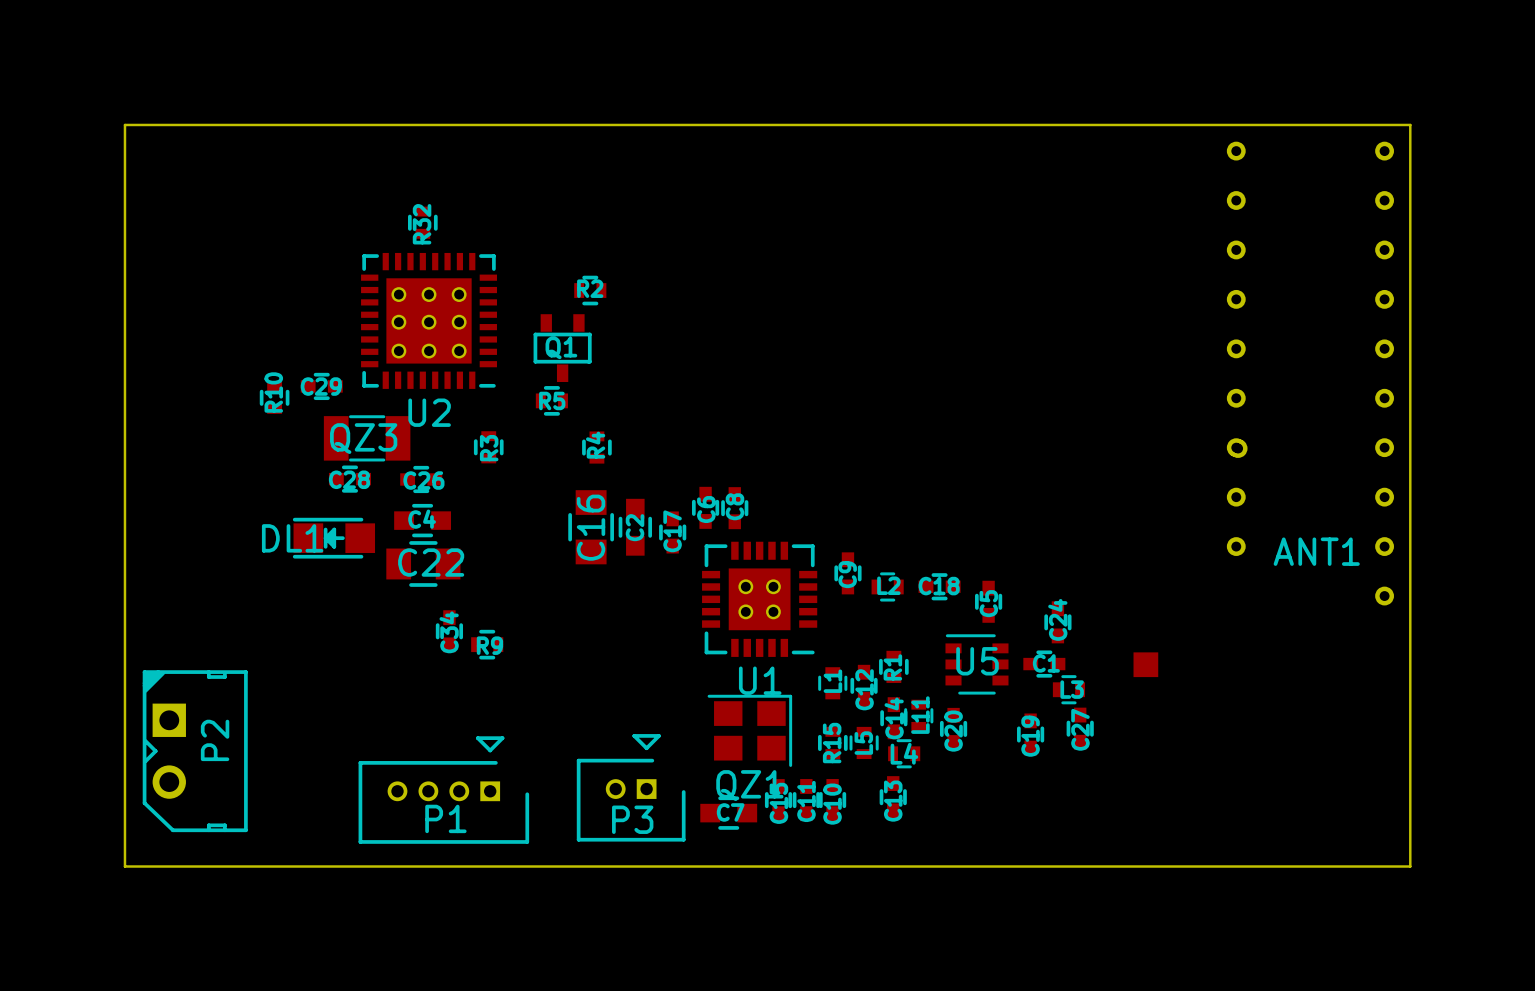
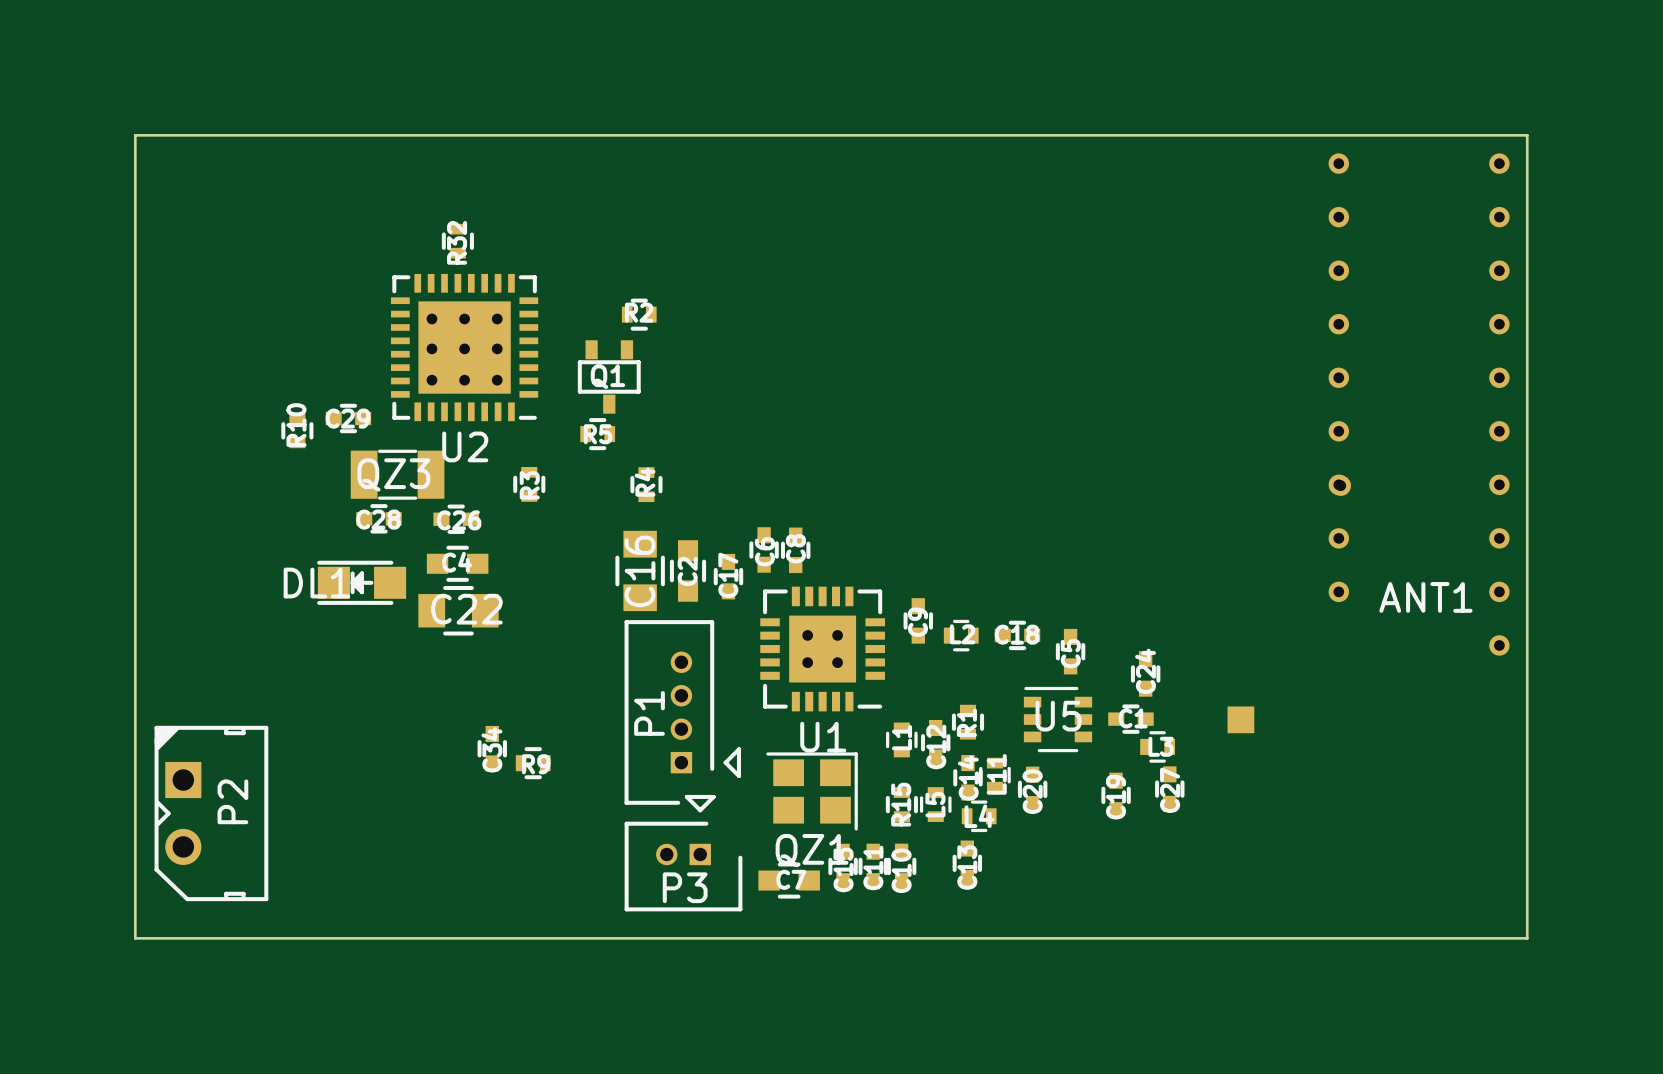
C34 position: (449, 631) -> (492, 748)
R9 position: (487, 644) -> (533, 763)
P1 rotation: 0° (443, 790) -> 90° clockwise (682, 712)
P1 position: (443, 790) -> (682, 712)

